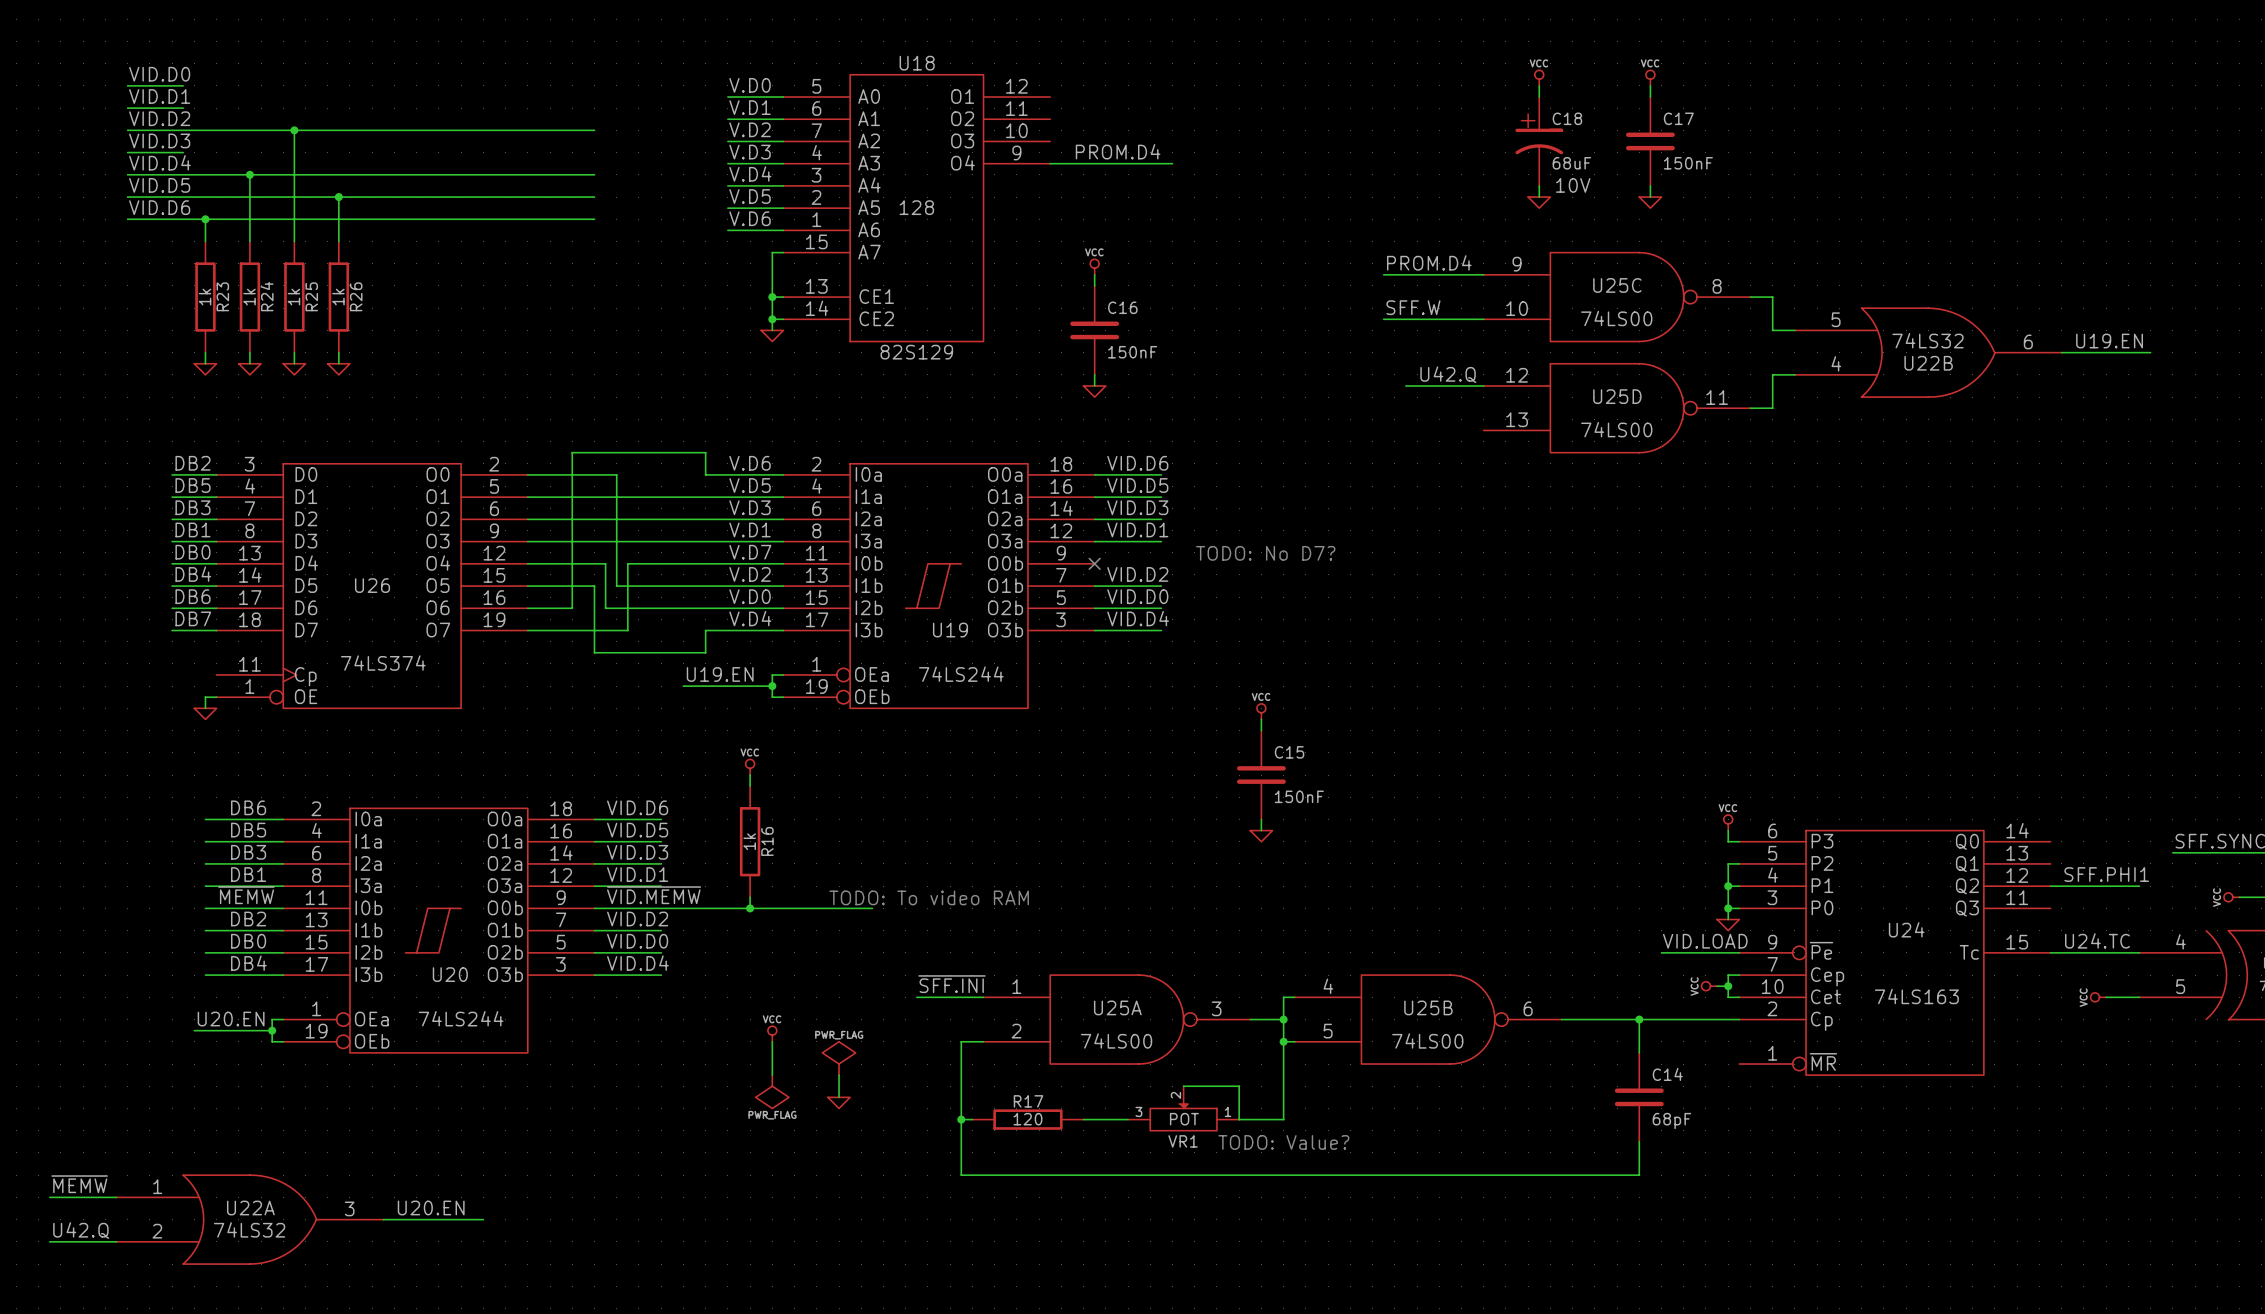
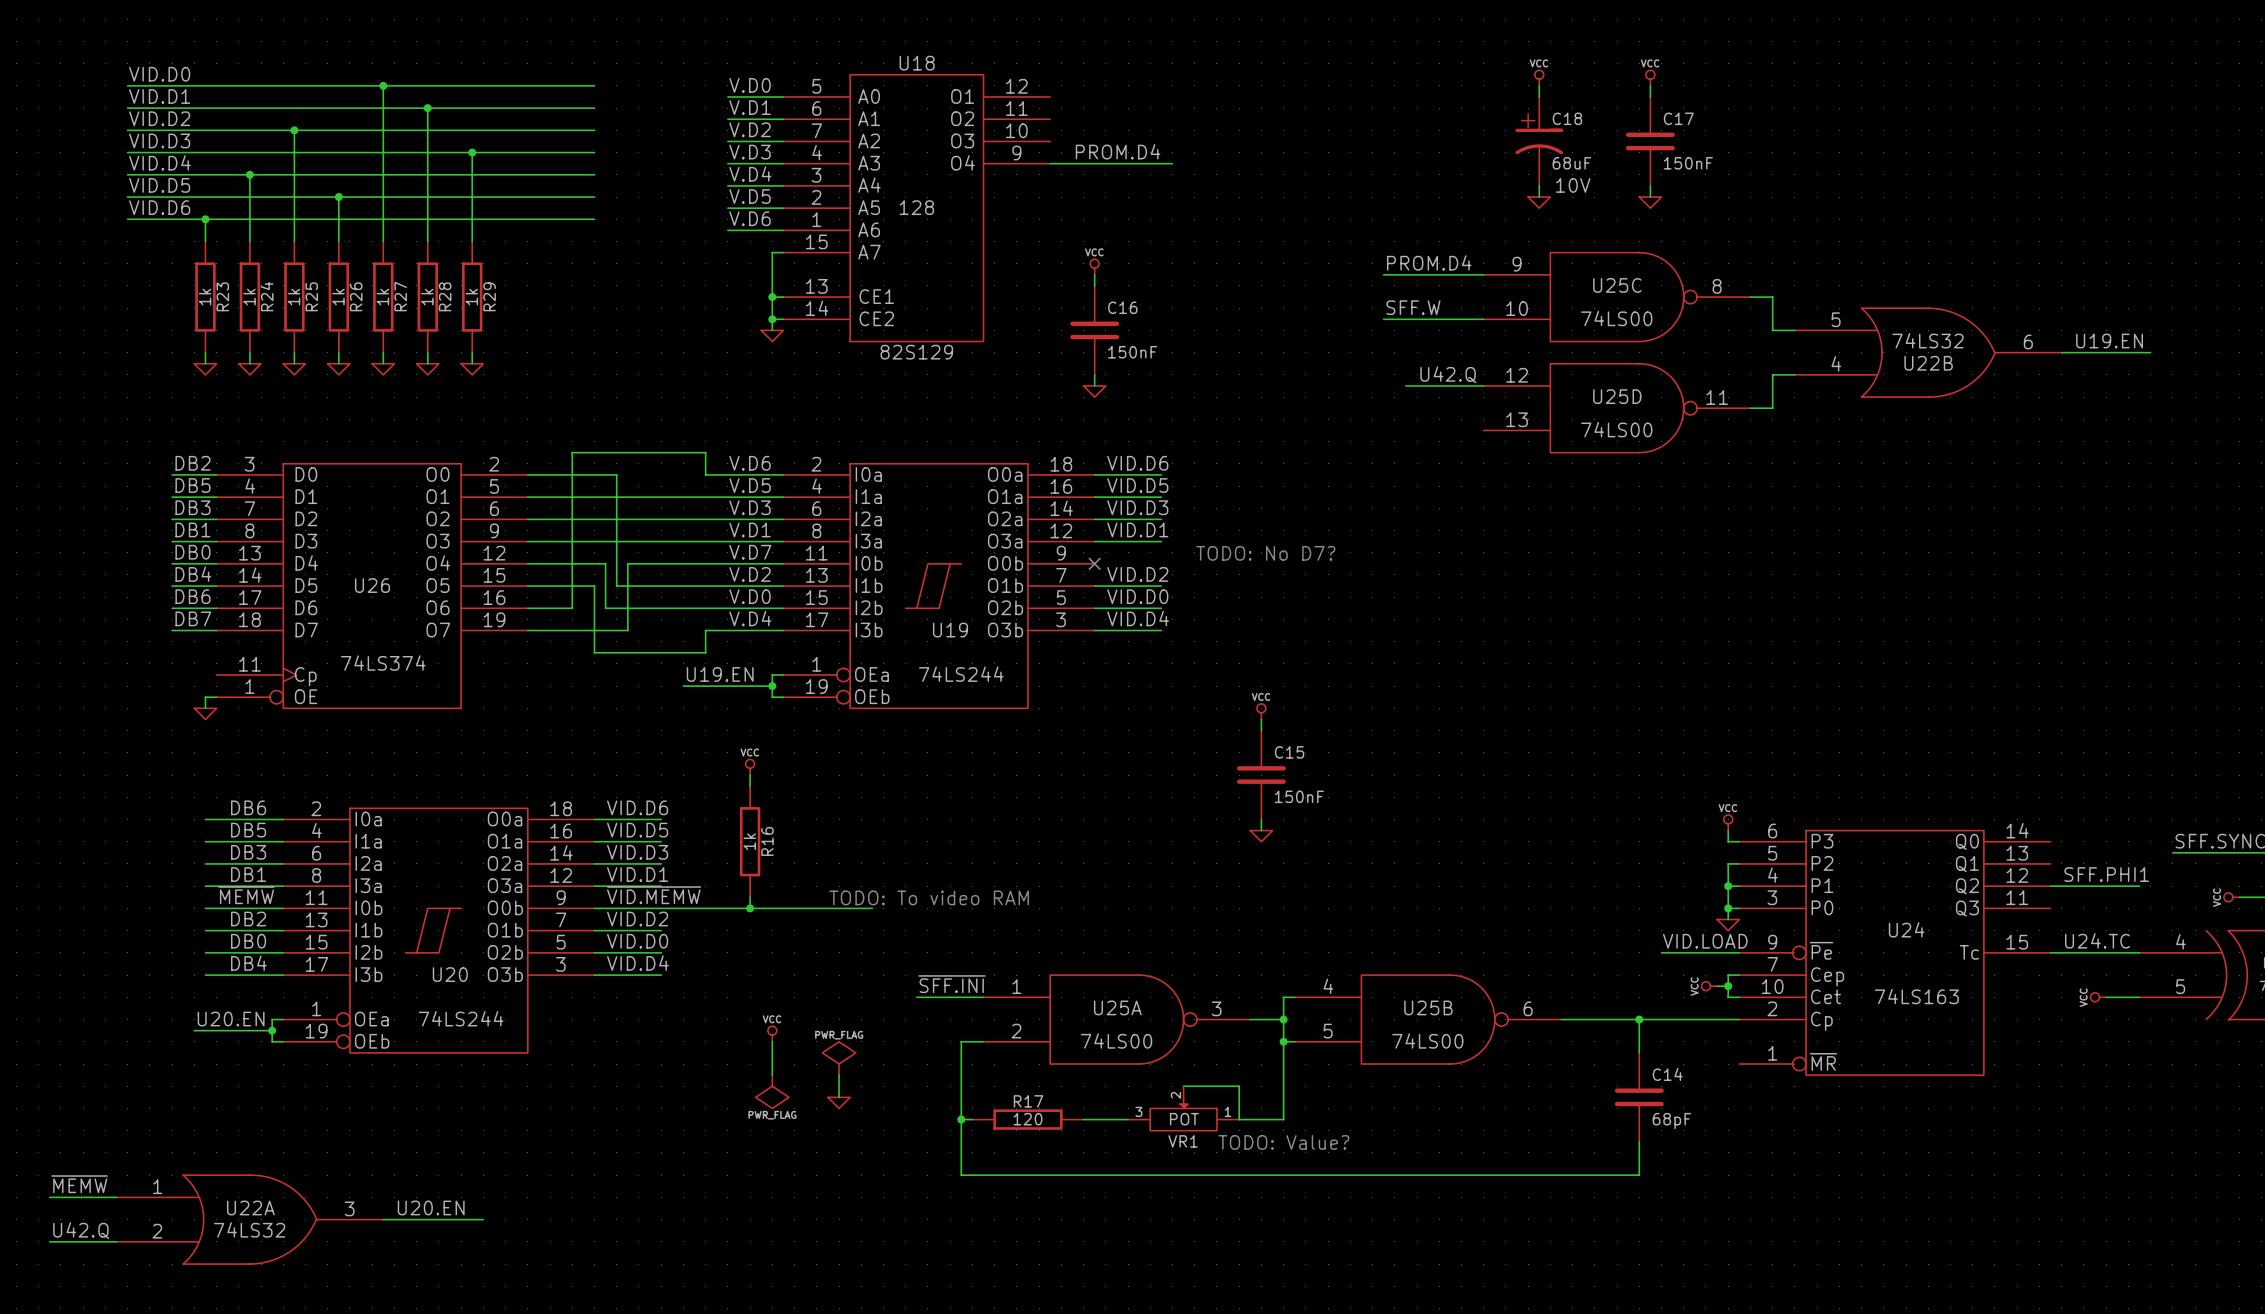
wire: none -> (183, 85) (594, 85)
wire: none -> (383, 85) (383, 241)
junction: none -> (383, 85)
wire: none -> (183, 108) (594, 108)
wire: none -> (427, 108) (427, 241)
junction: none -> (427, 108)
wire: none -> (183, 152) (594, 152)
wire: none -> (472, 152) (472, 241)
junction: none -> (472, 152)
R27: none -> 1k (383, 297)
R28: none -> 1k (427, 297)
R29: none -> 1k (472, 297)
wire: none -> (383, 352) (383, 363)
wire: none -> (427, 352) (427, 363)
wire: none -> (472, 352) (472, 363)
power symbol: none -> (383, 369)
power symbol: none -> (427, 369)
power symbol: none -> (472, 369)

